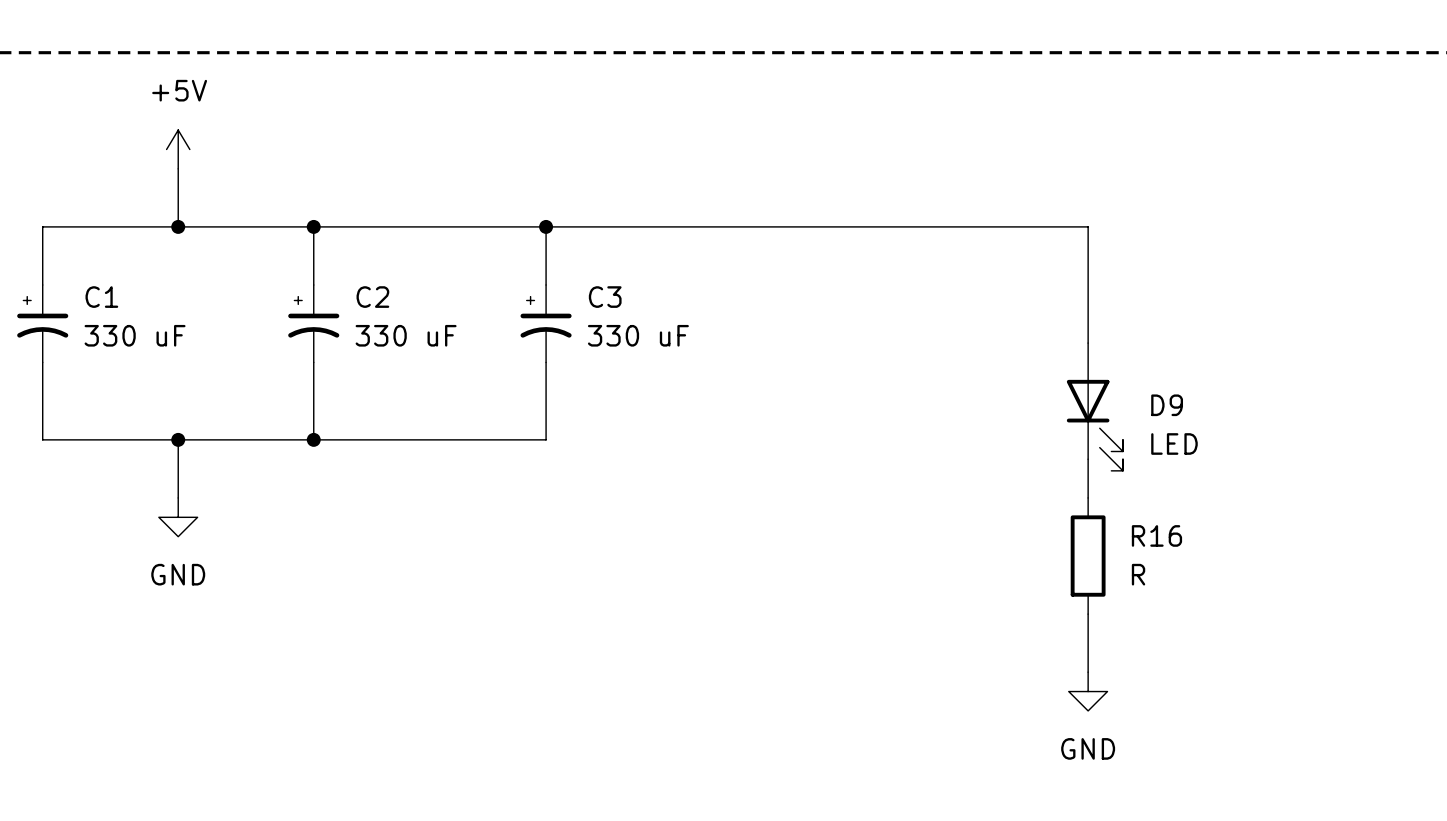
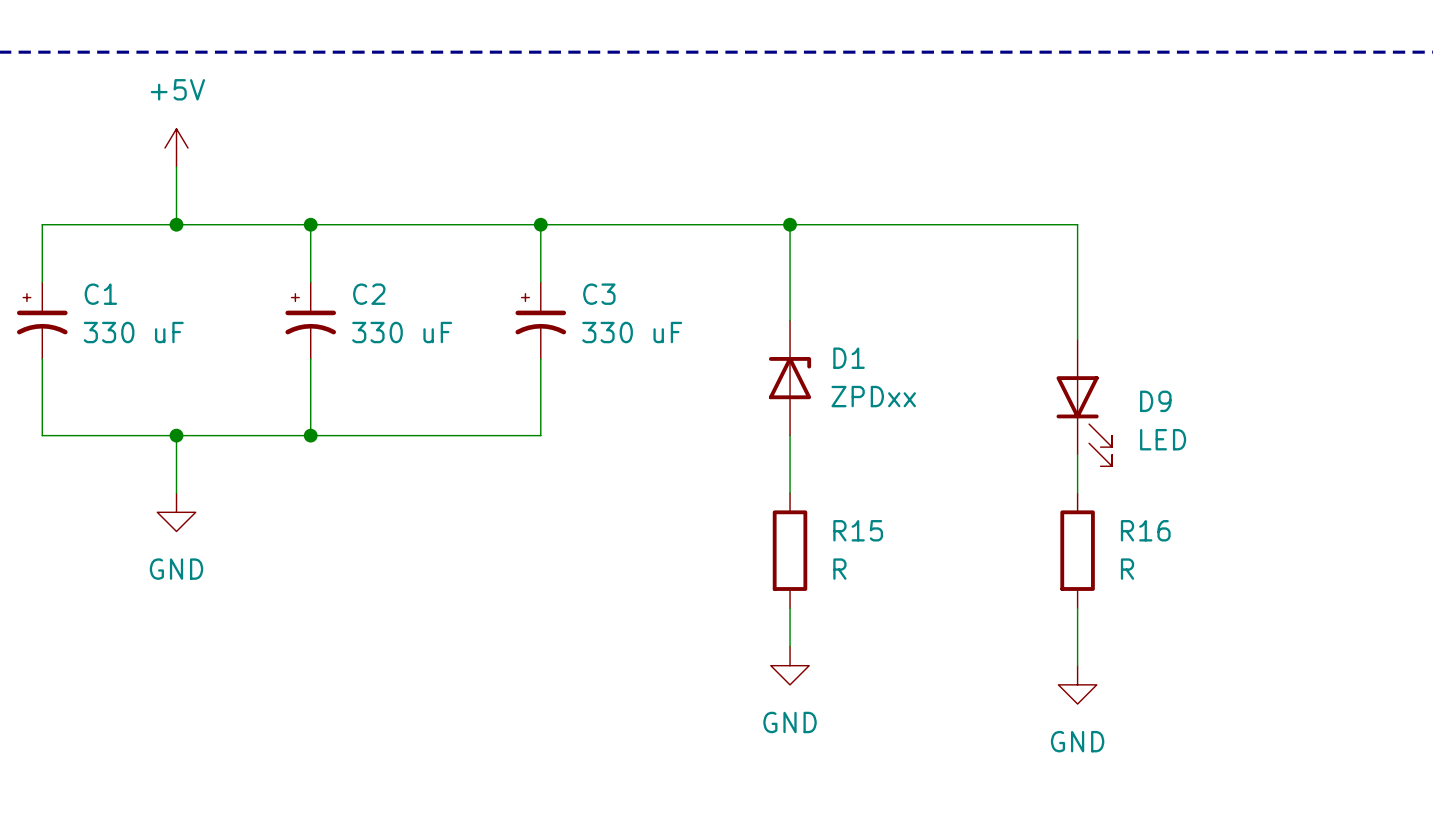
wire: none -> (790, 224) (790, 320)
junction: none -> (790, 224)
D1: none -> ZPDxx (790, 378)
wire: none -> (790, 435) (790, 493)
R15: none -> R (790, 550)
wire: none -> (790, 608) (790, 646)
power symbol: none -> GND (790, 665)

